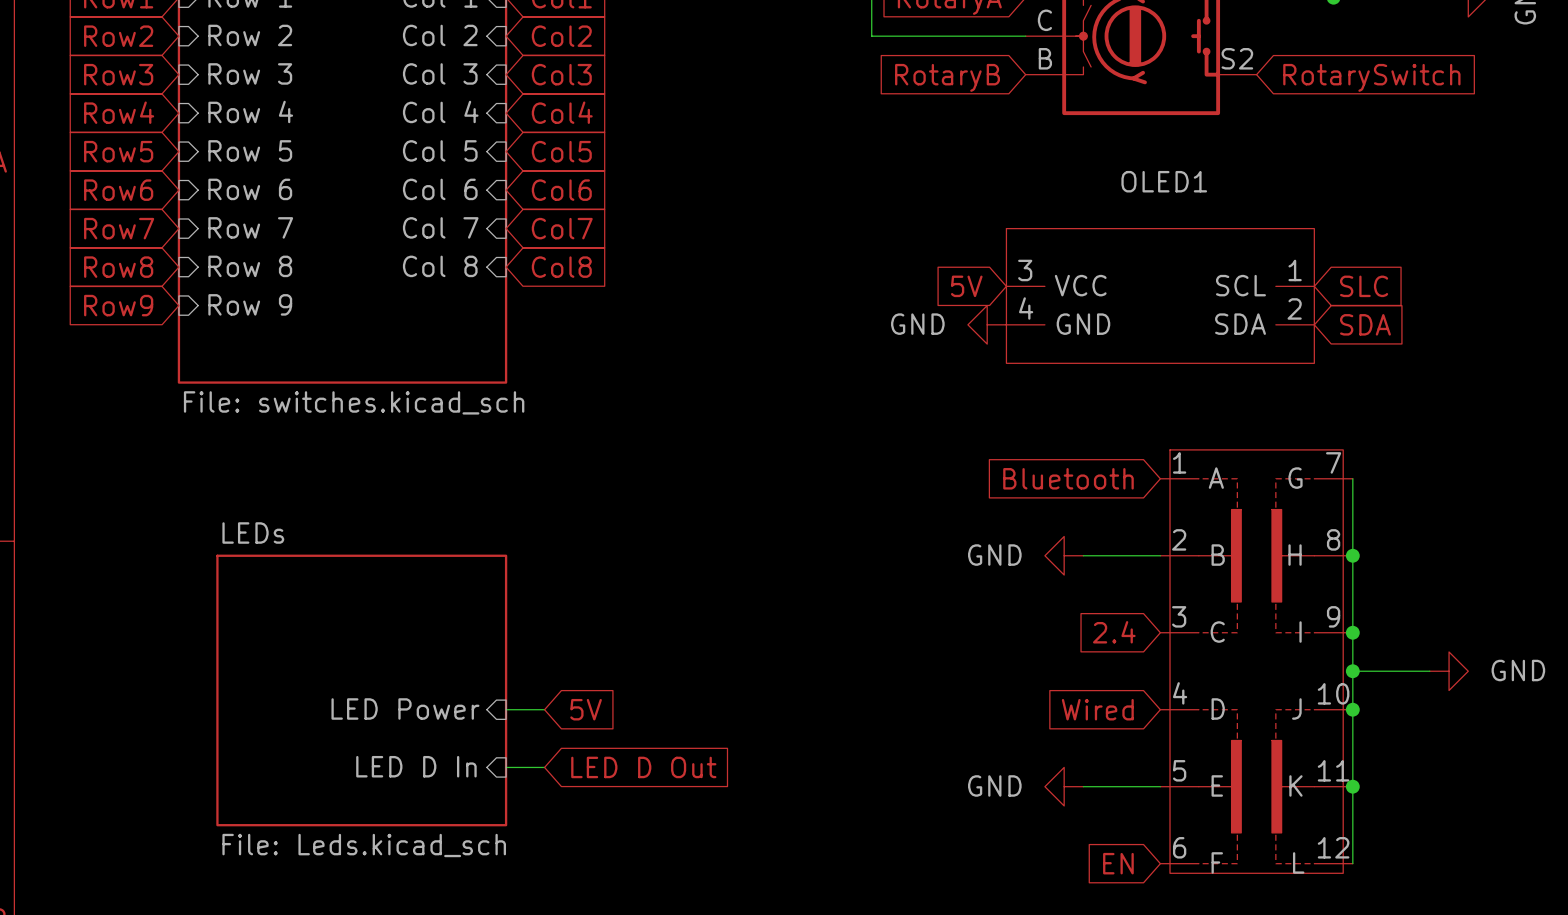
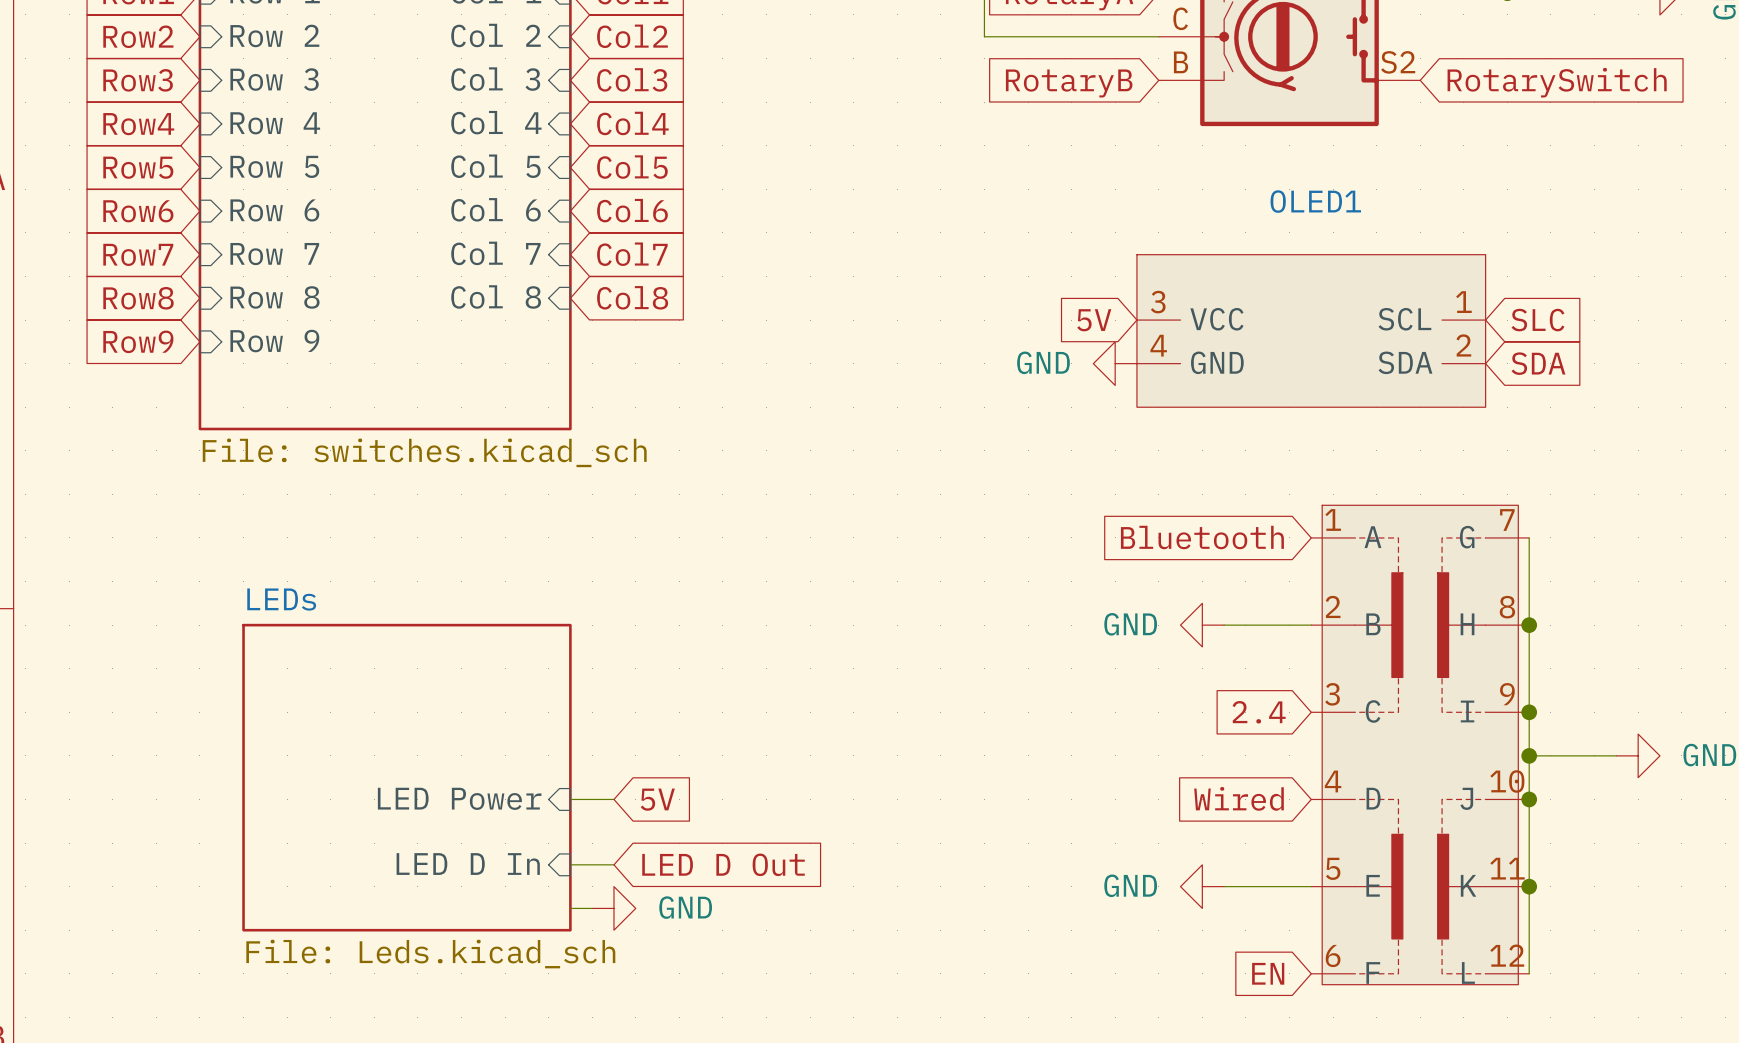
wire: none -> (570, 908) (592, 908)
power symbol: none -> GND (613, 908)

